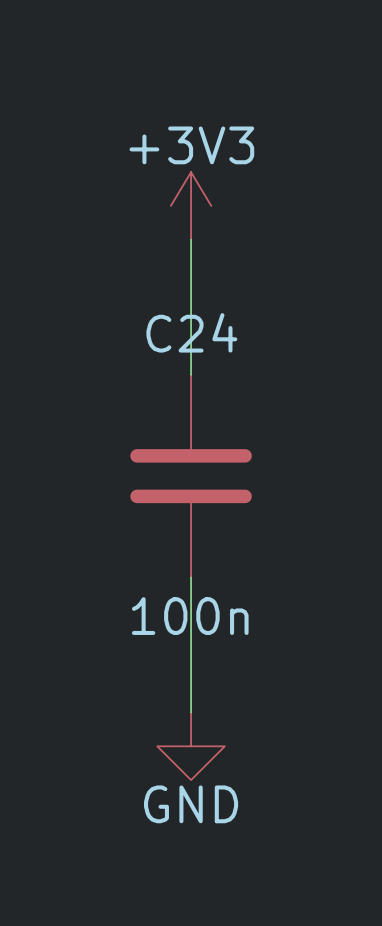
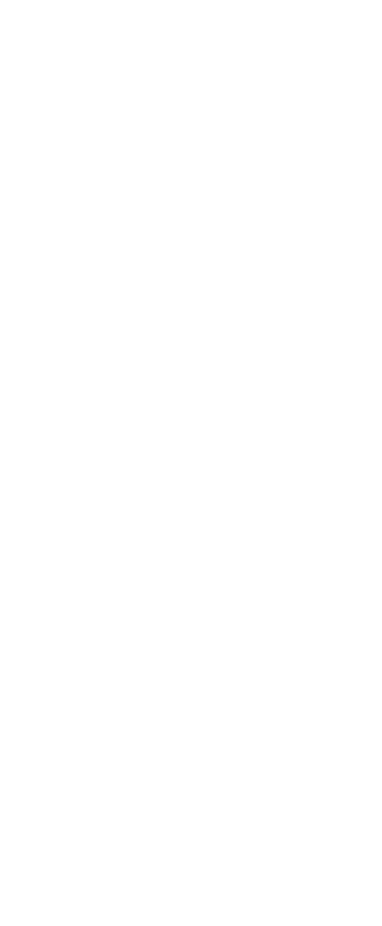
power symbol: +3V3 (191, 205) -> none
wire: (191, 239) (191, 374) -> none
C24: 100n (191, 476) -> none
wire: (191, 577) (191, 712) -> none
power symbol: GND (191, 746) -> none

